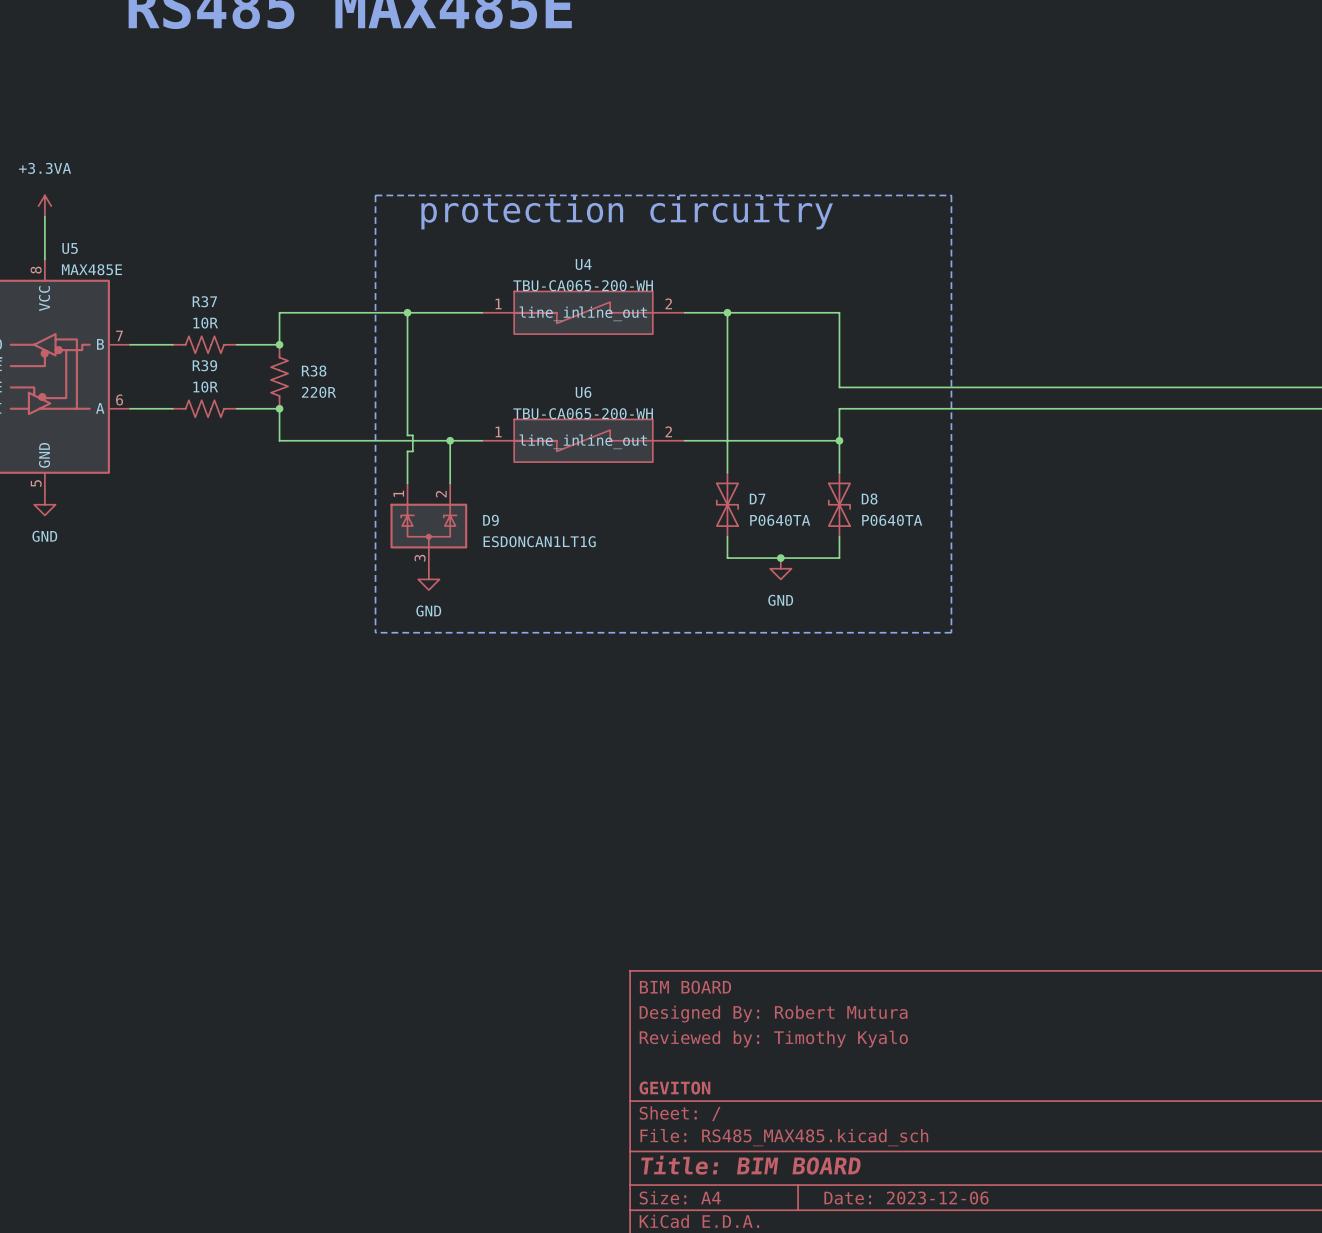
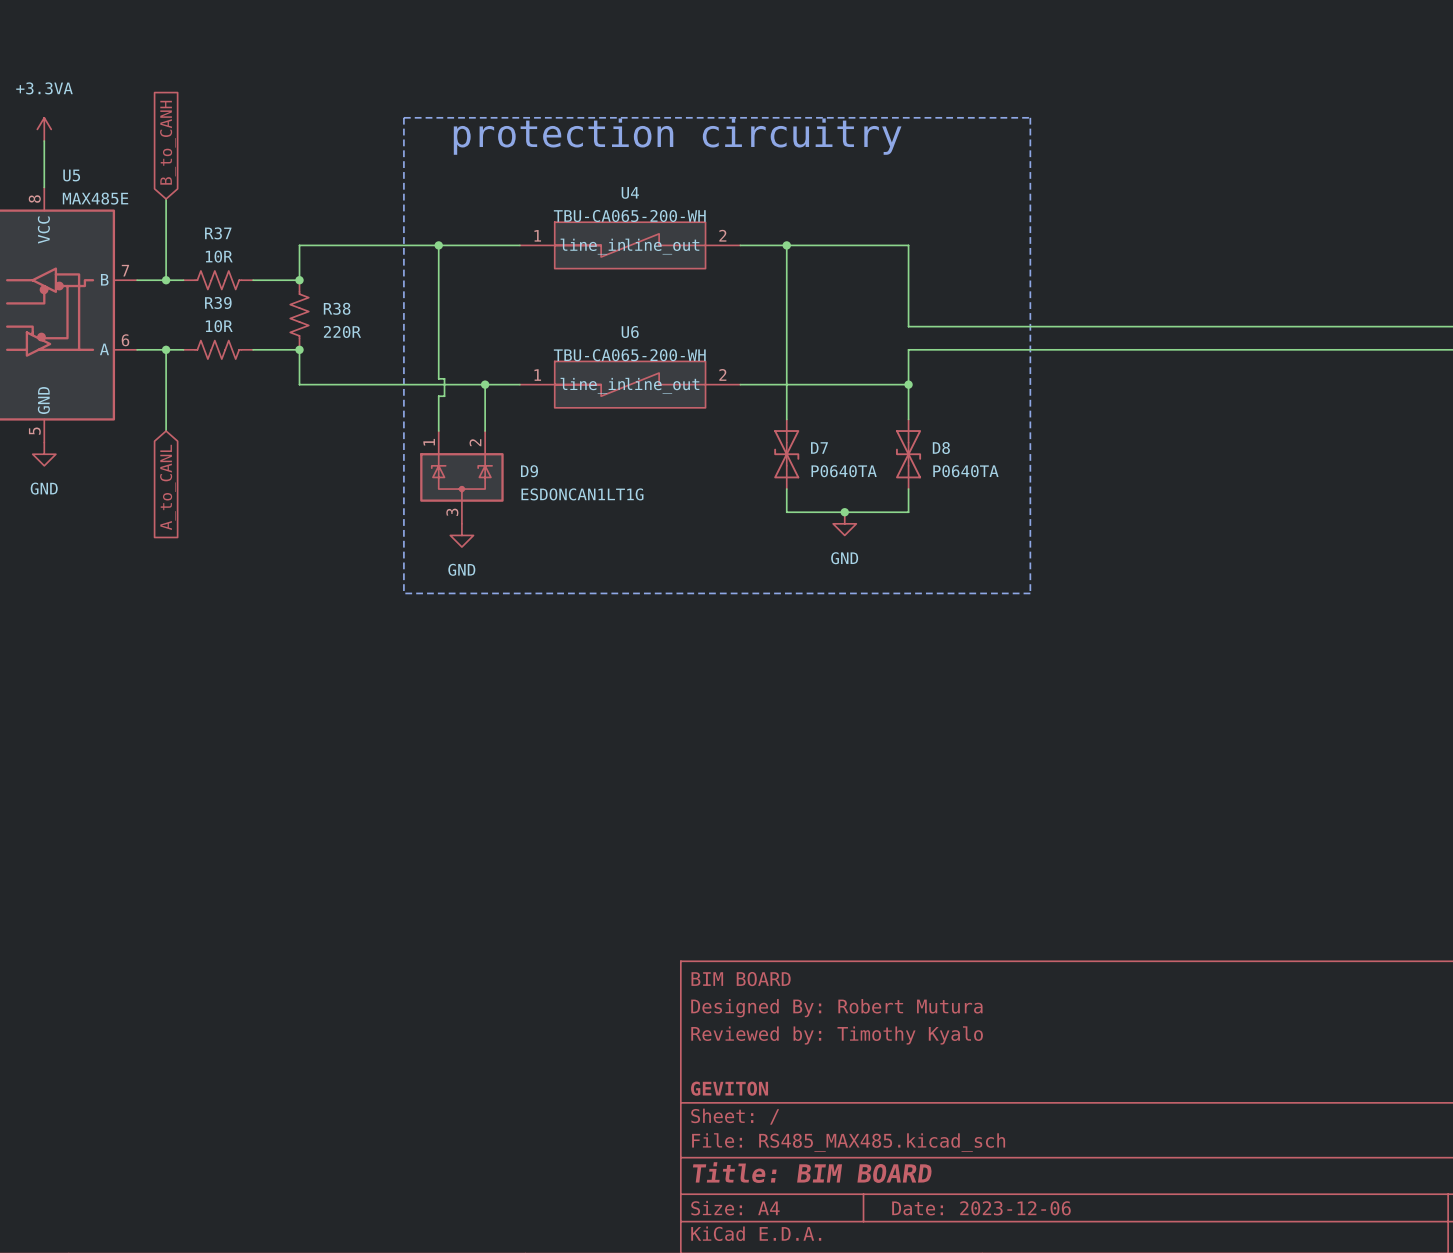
global label: none -> B_to_CANH (167, 142)
wire: none -> (166, 199) (166, 280)
junction: none -> (166, 280)
wire: none -> (166, 349) (166, 431)
junction: none -> (166, 349)
global label: none -> A_to_CANL (167, 487)

